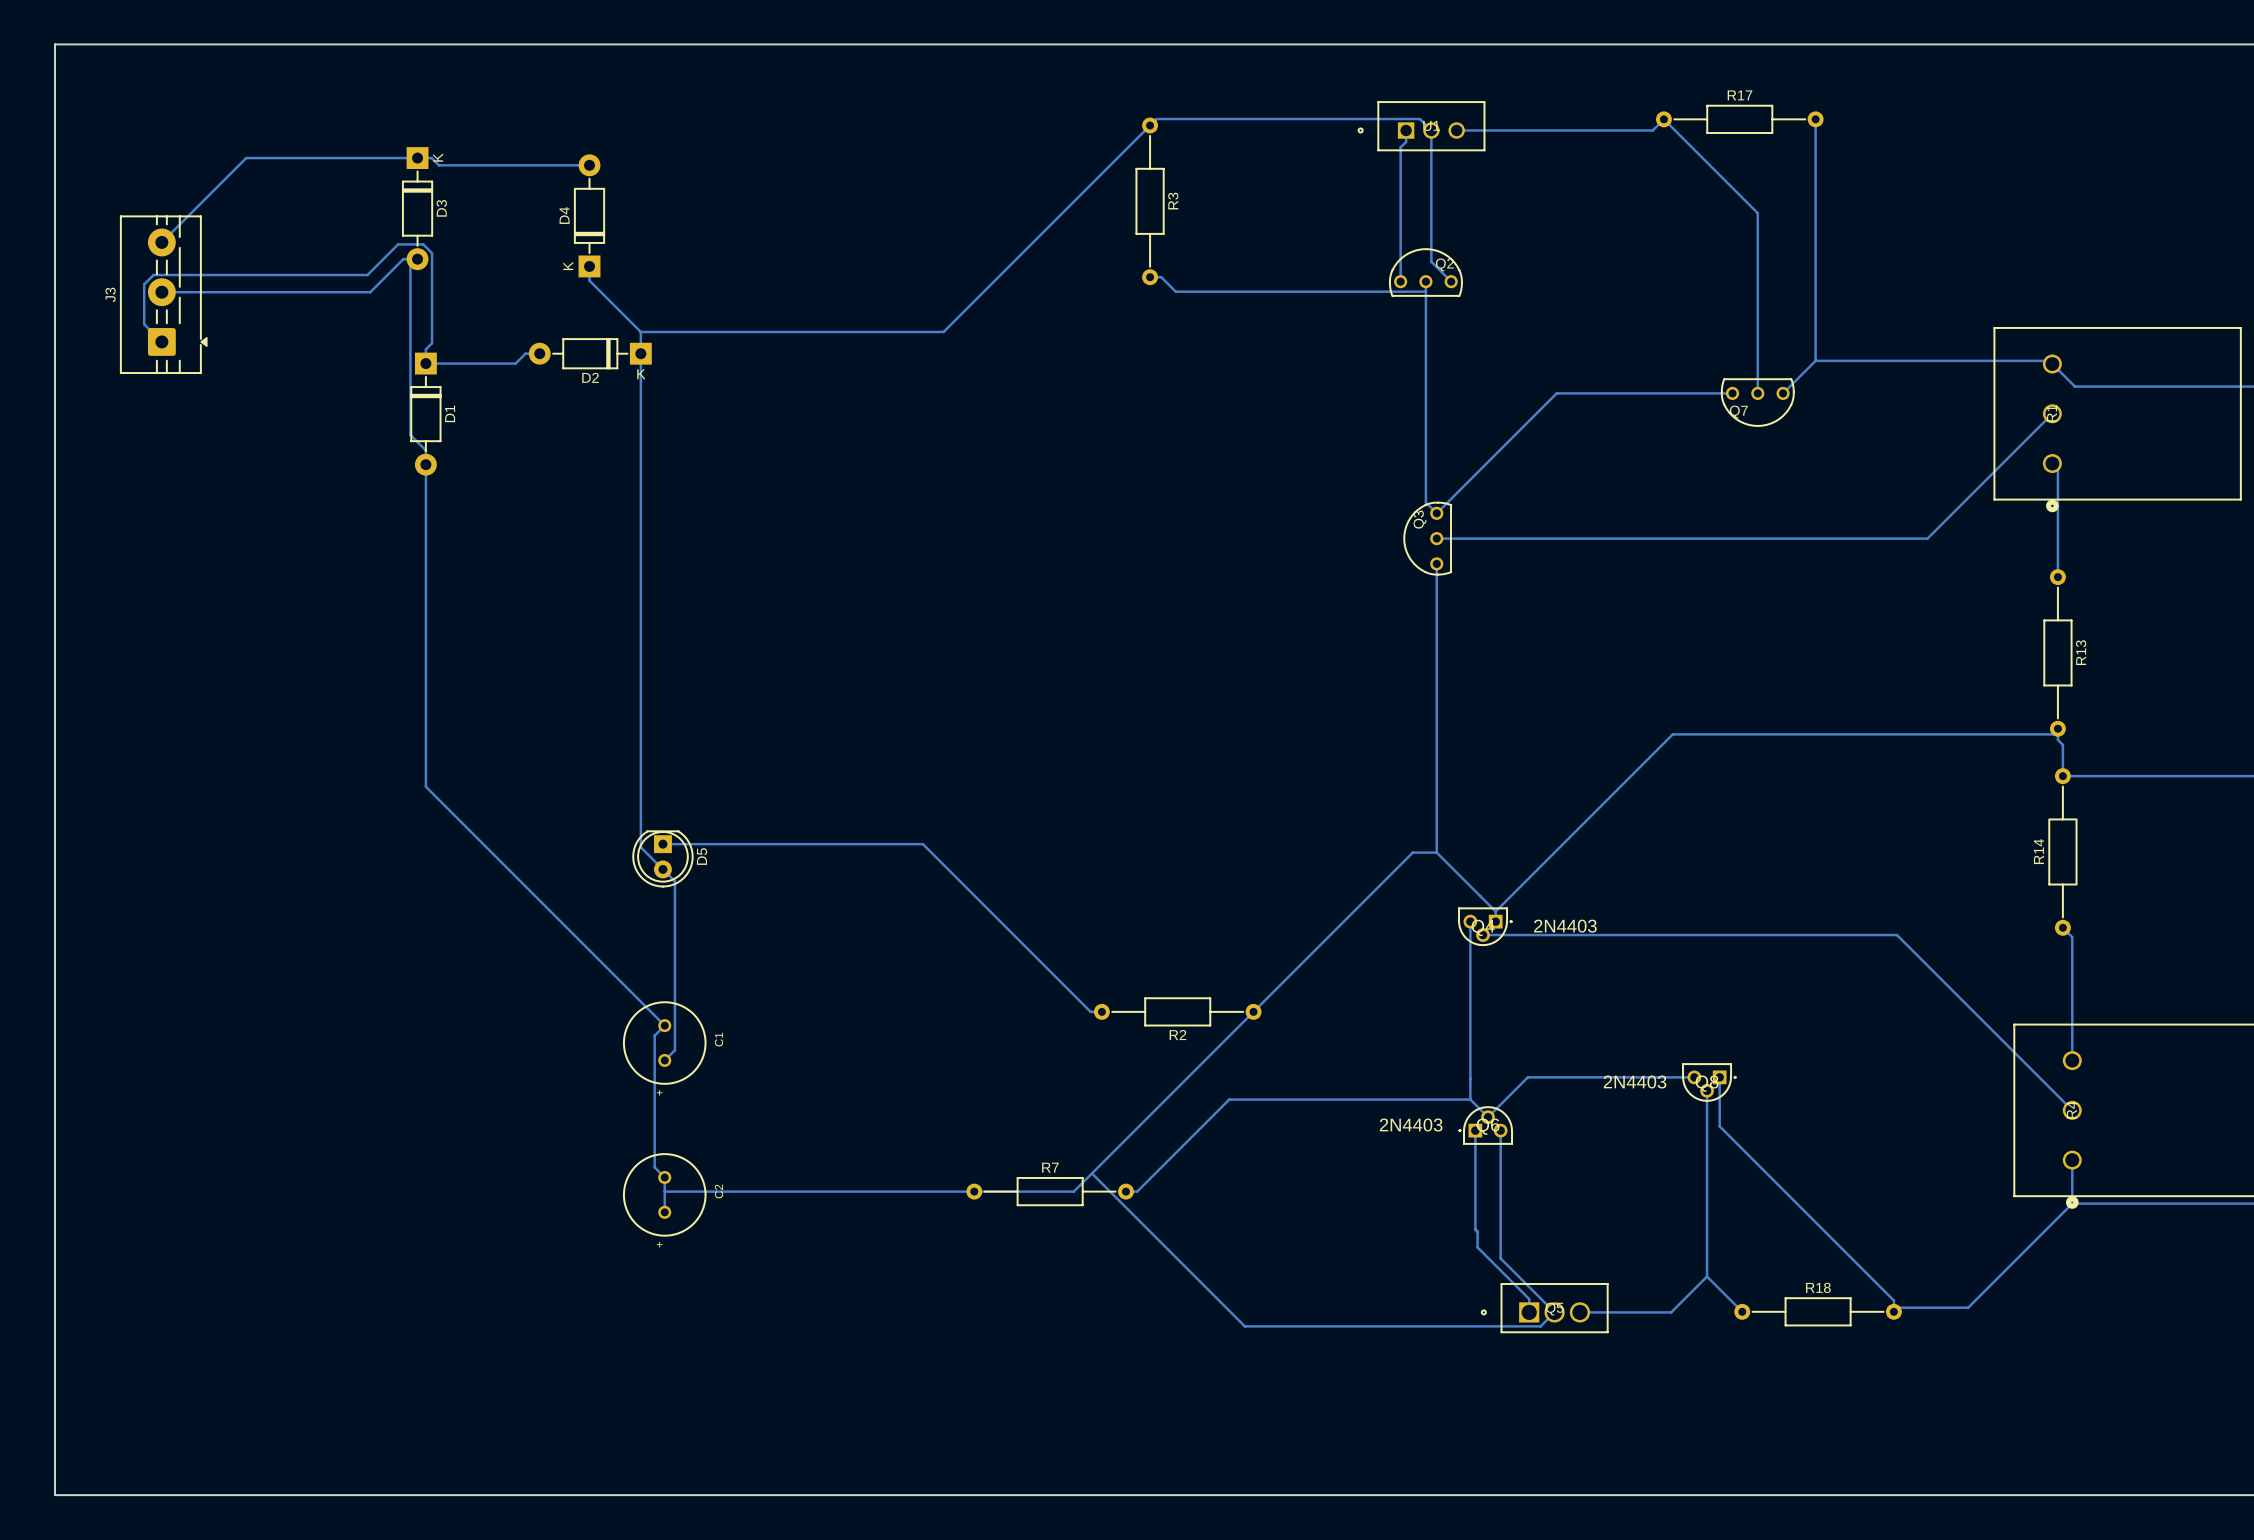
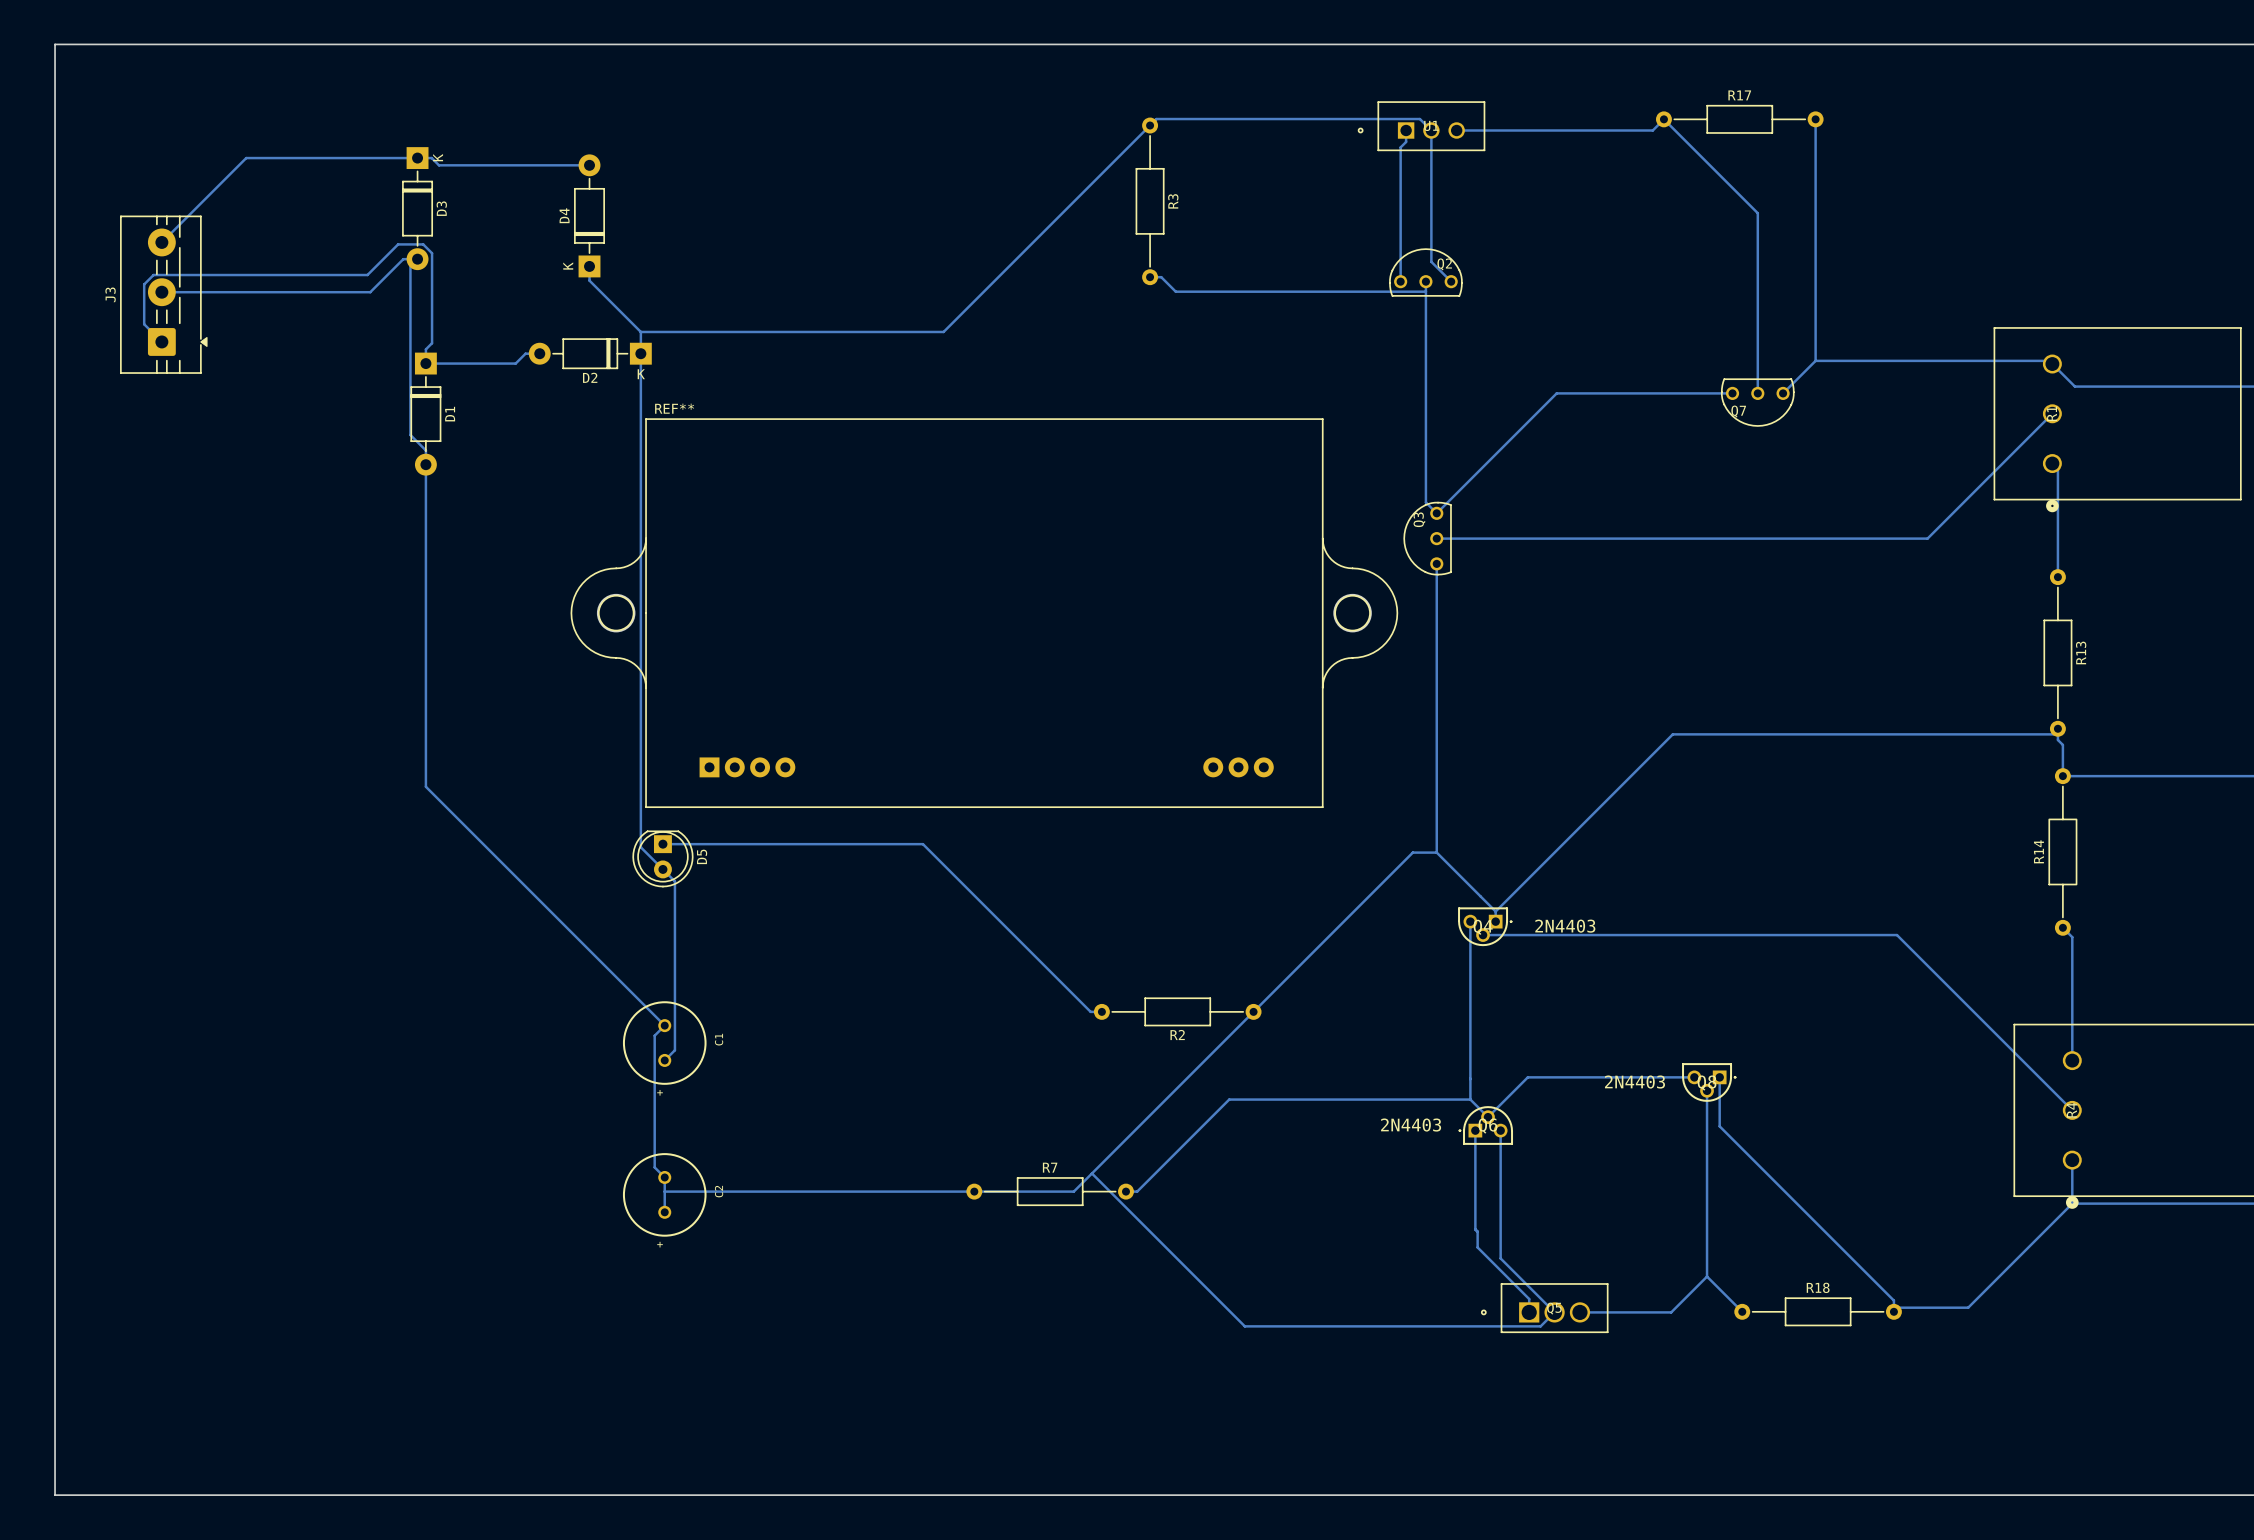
REF**: none -> (984, 613)

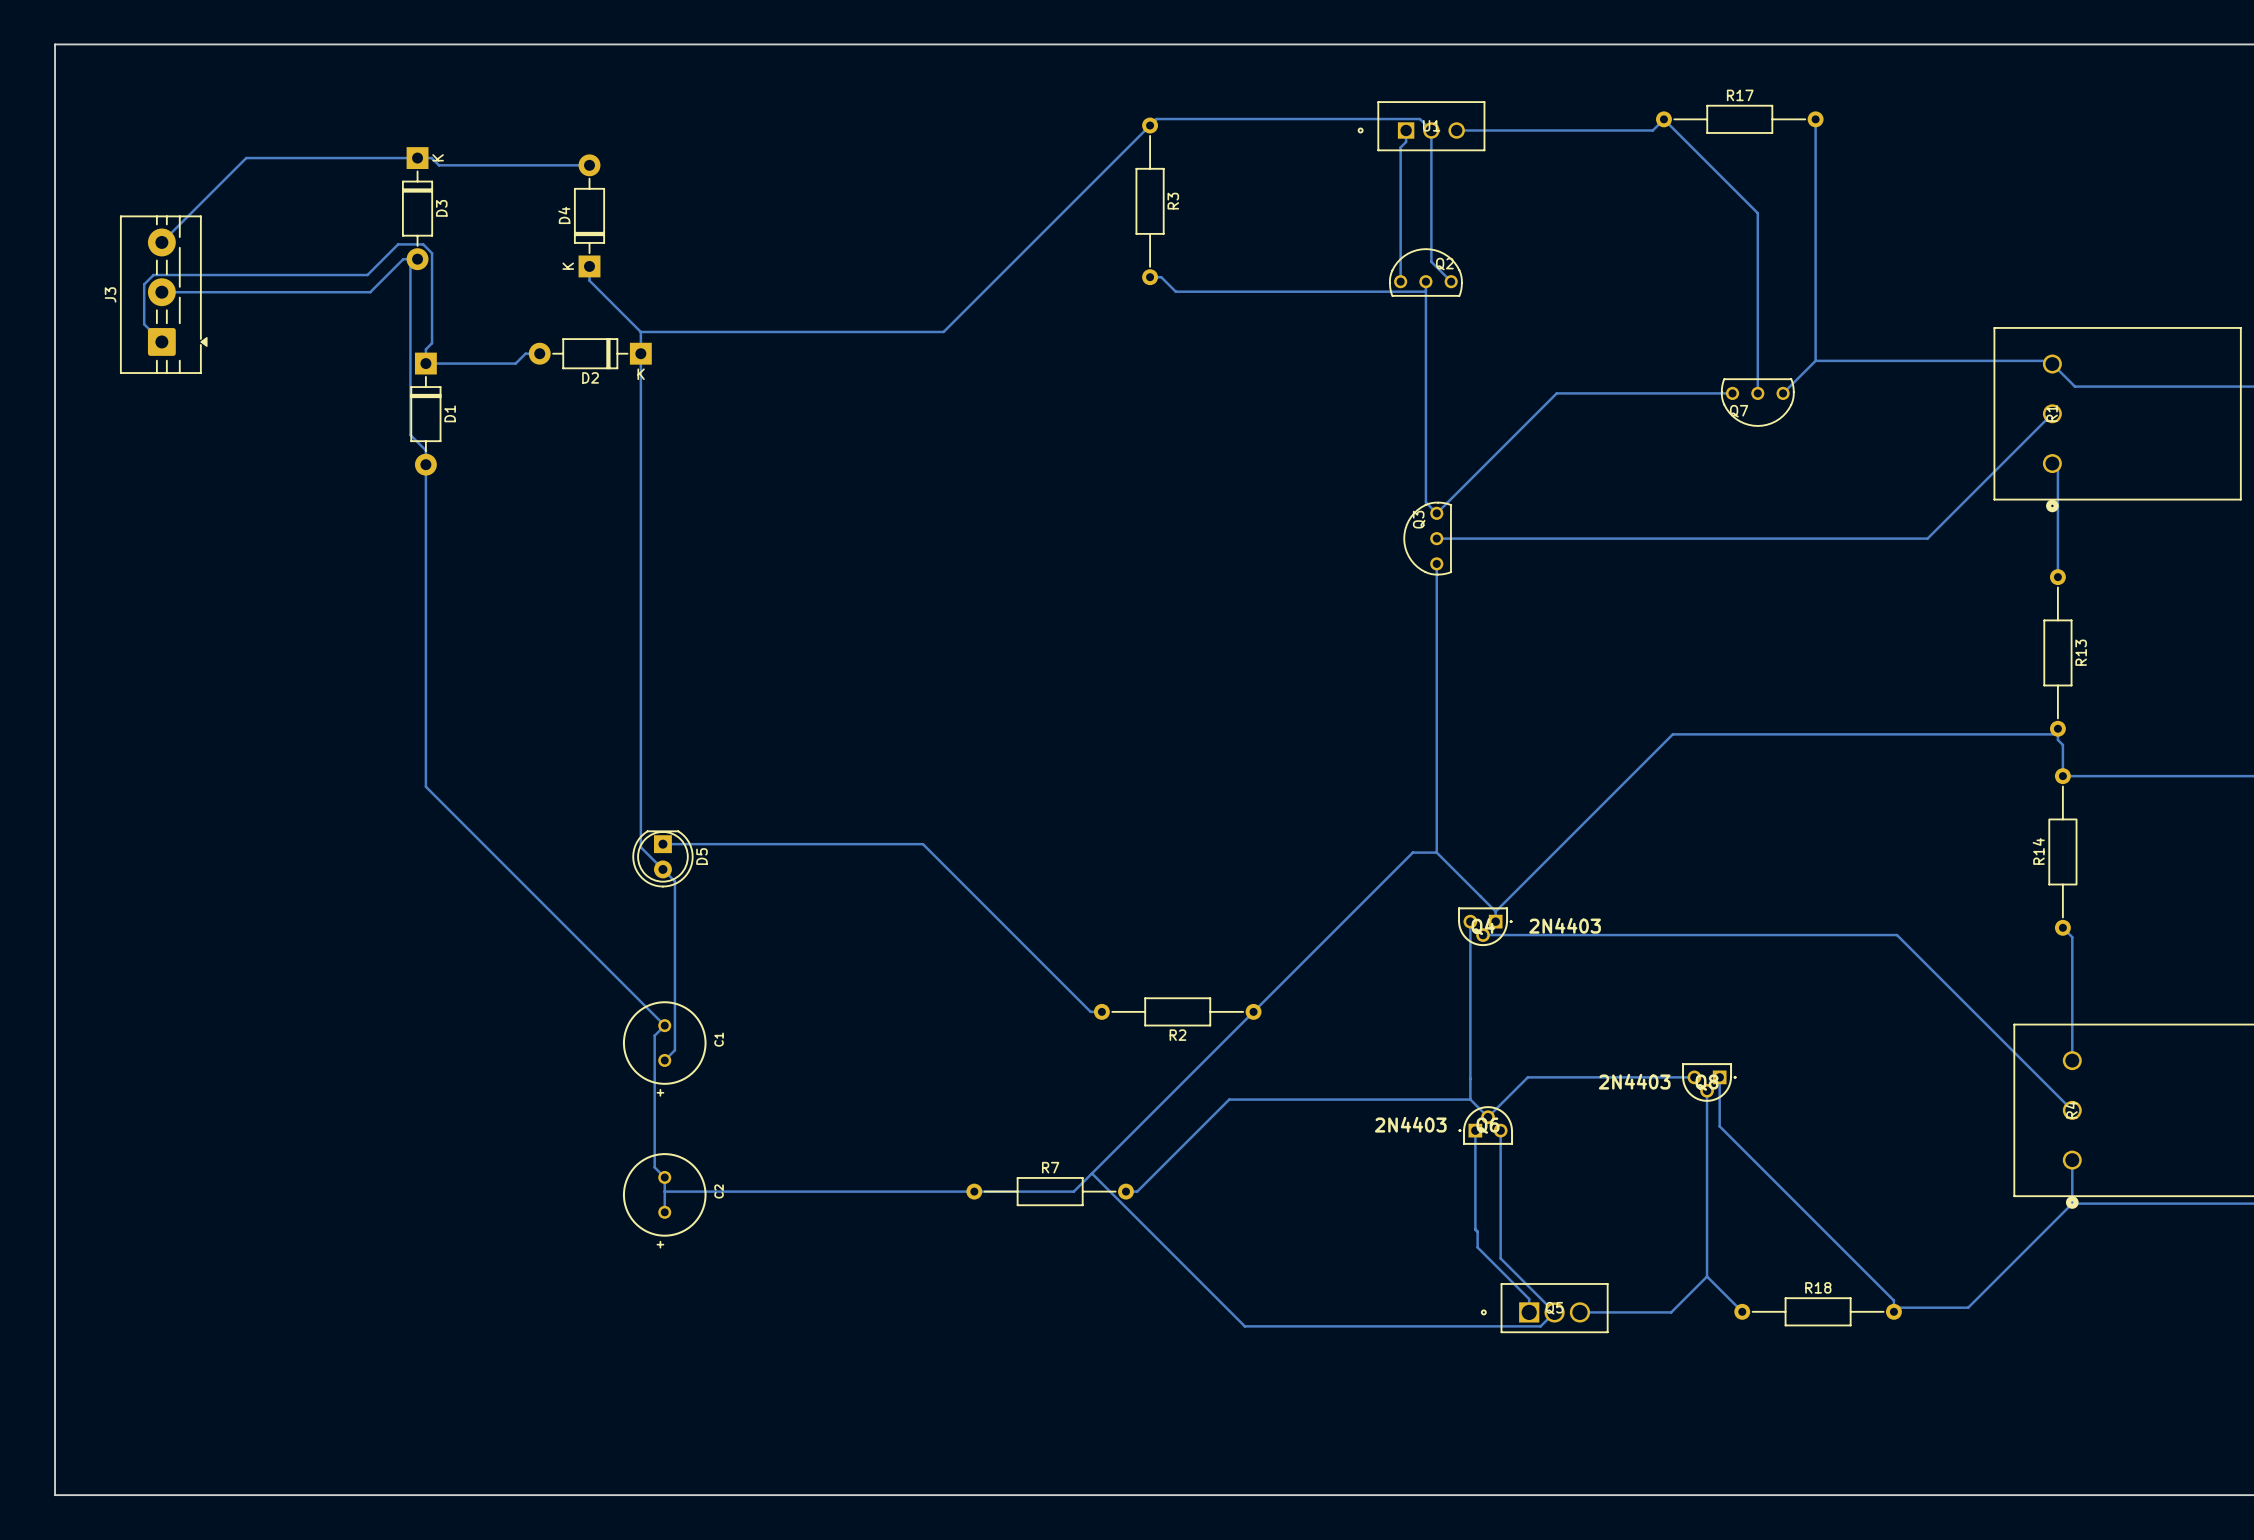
REF**: (984, 613) -> none

